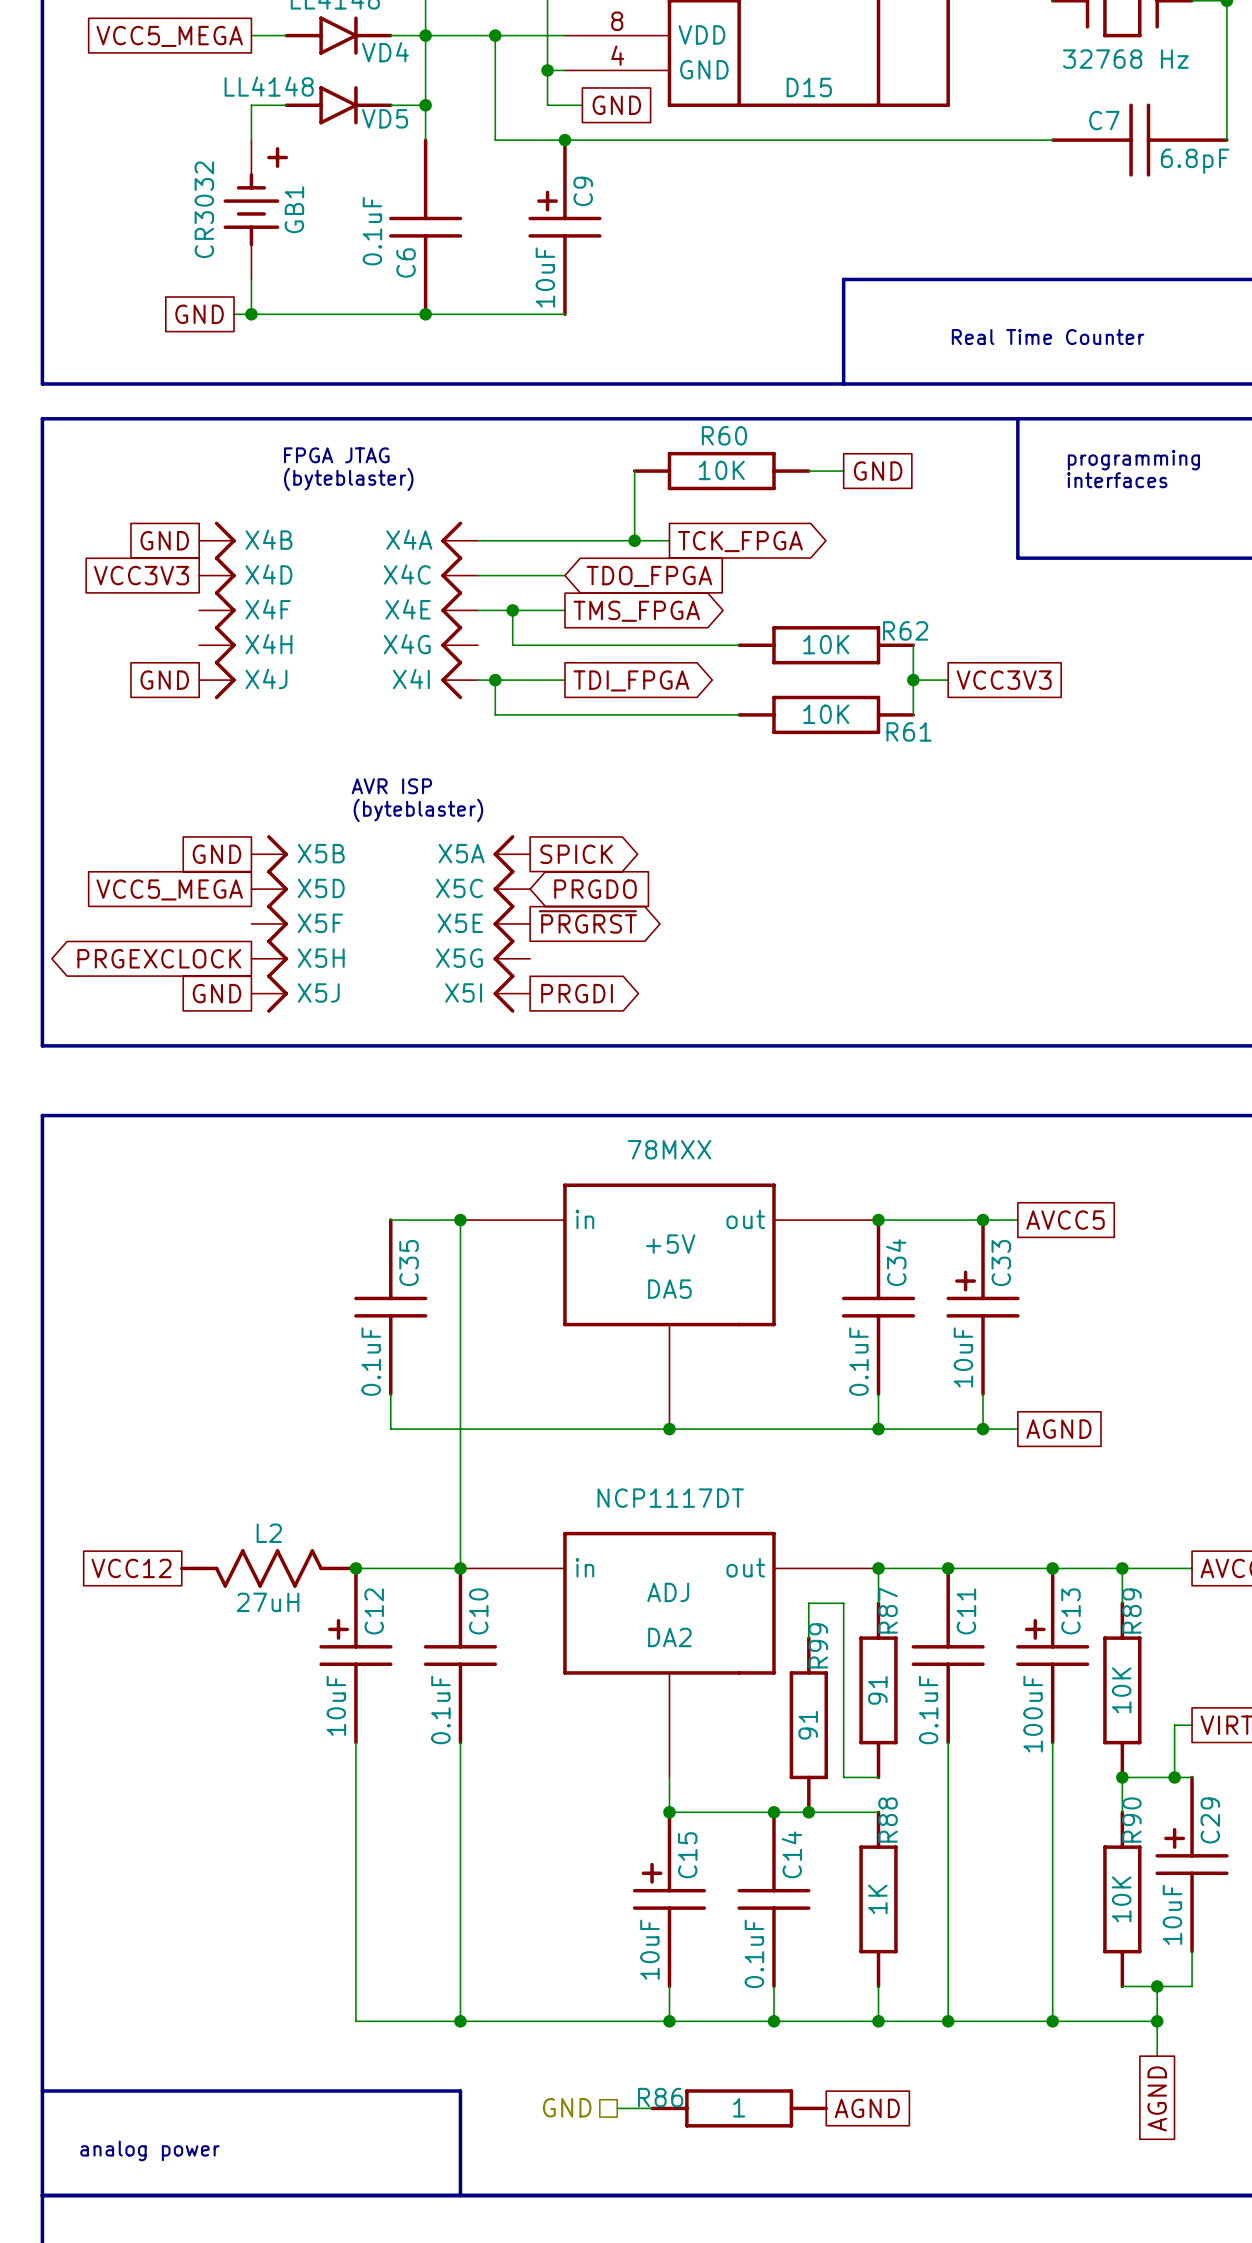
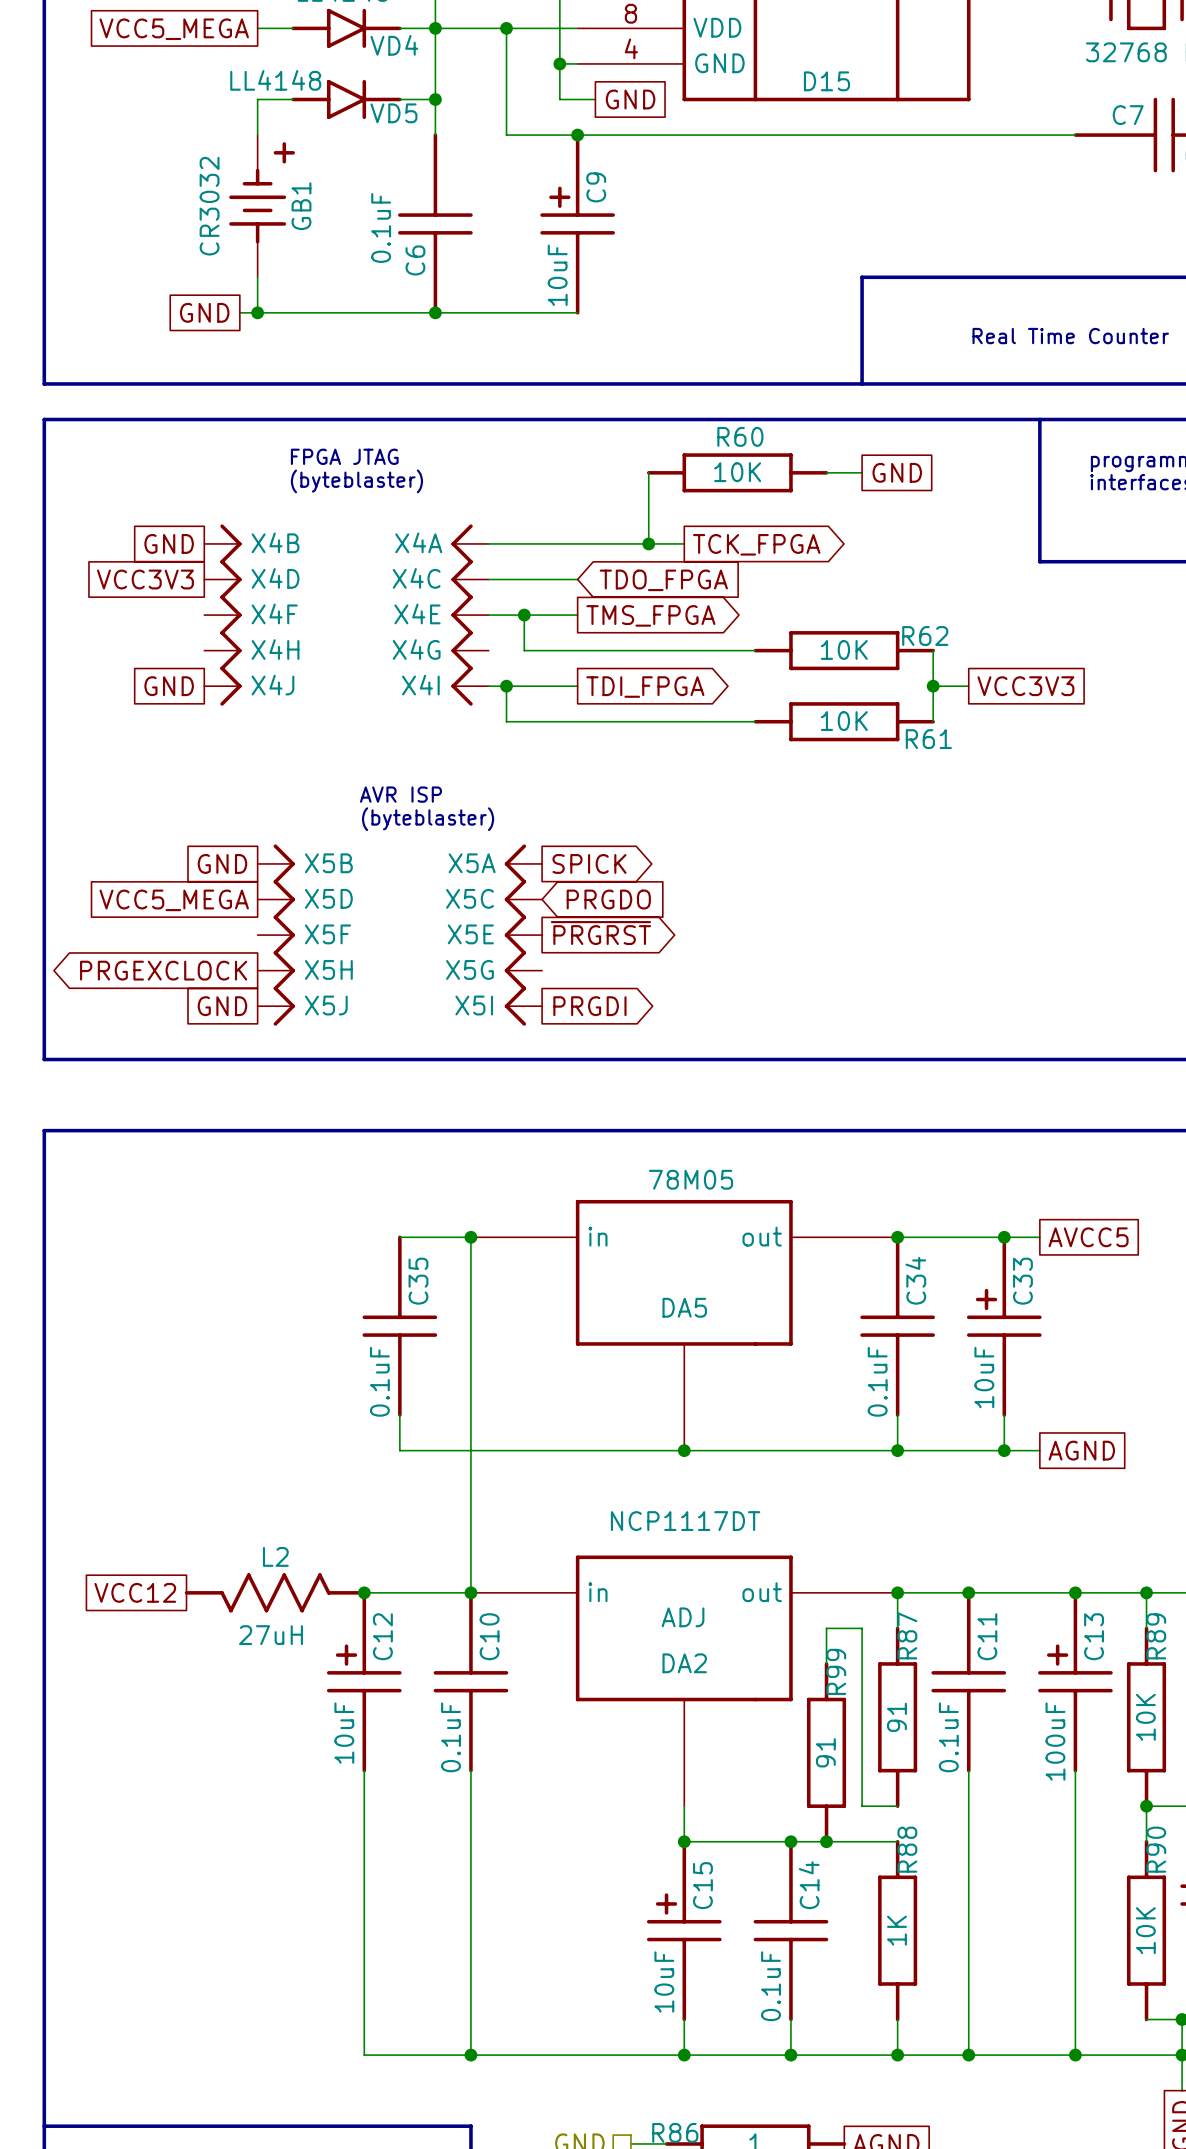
DA5 value: 78MXX (669, 1149) -> 78M05 (690, 1179)
DA5 text: +5V (670, 1244) -> none
L2 text: 27uH (268, 1602) -> none
L2 value: none -> 27uH (271, 1635)

